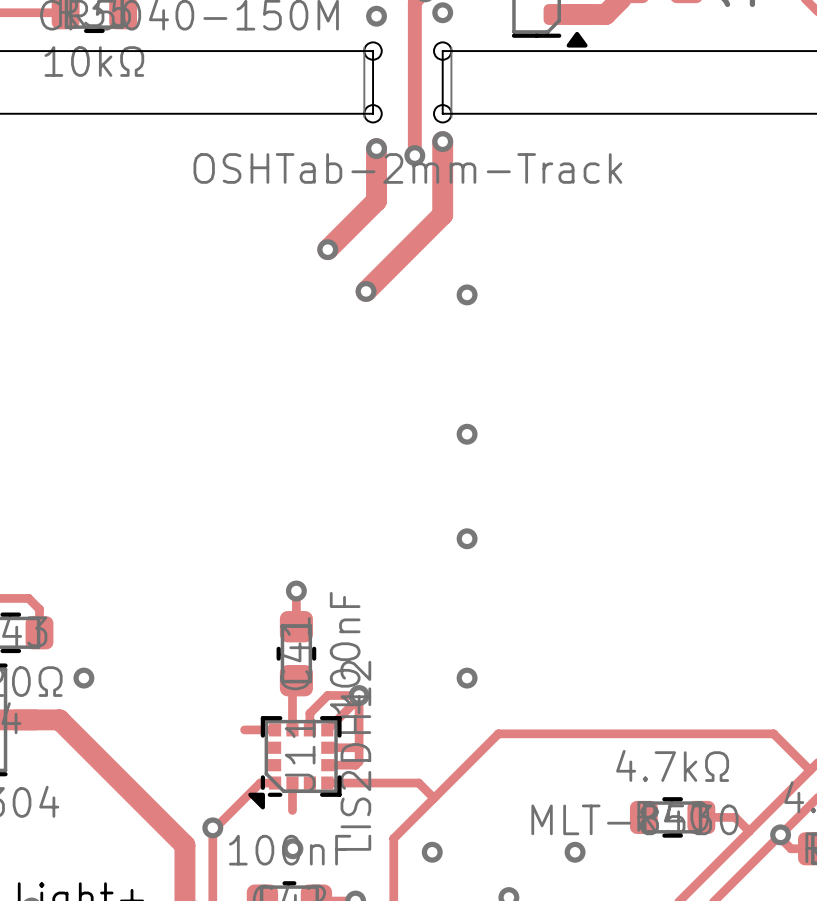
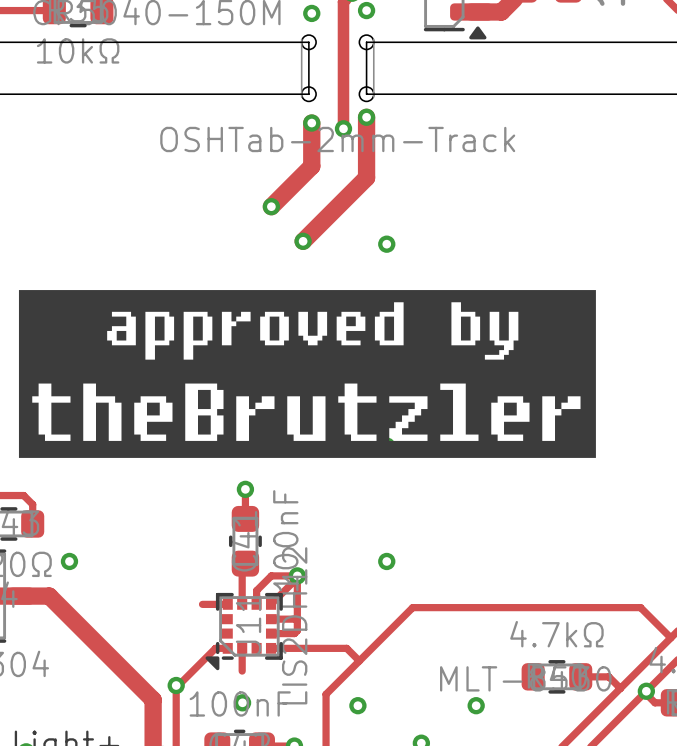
drawing: none -> [18, 290, 596, 458]

